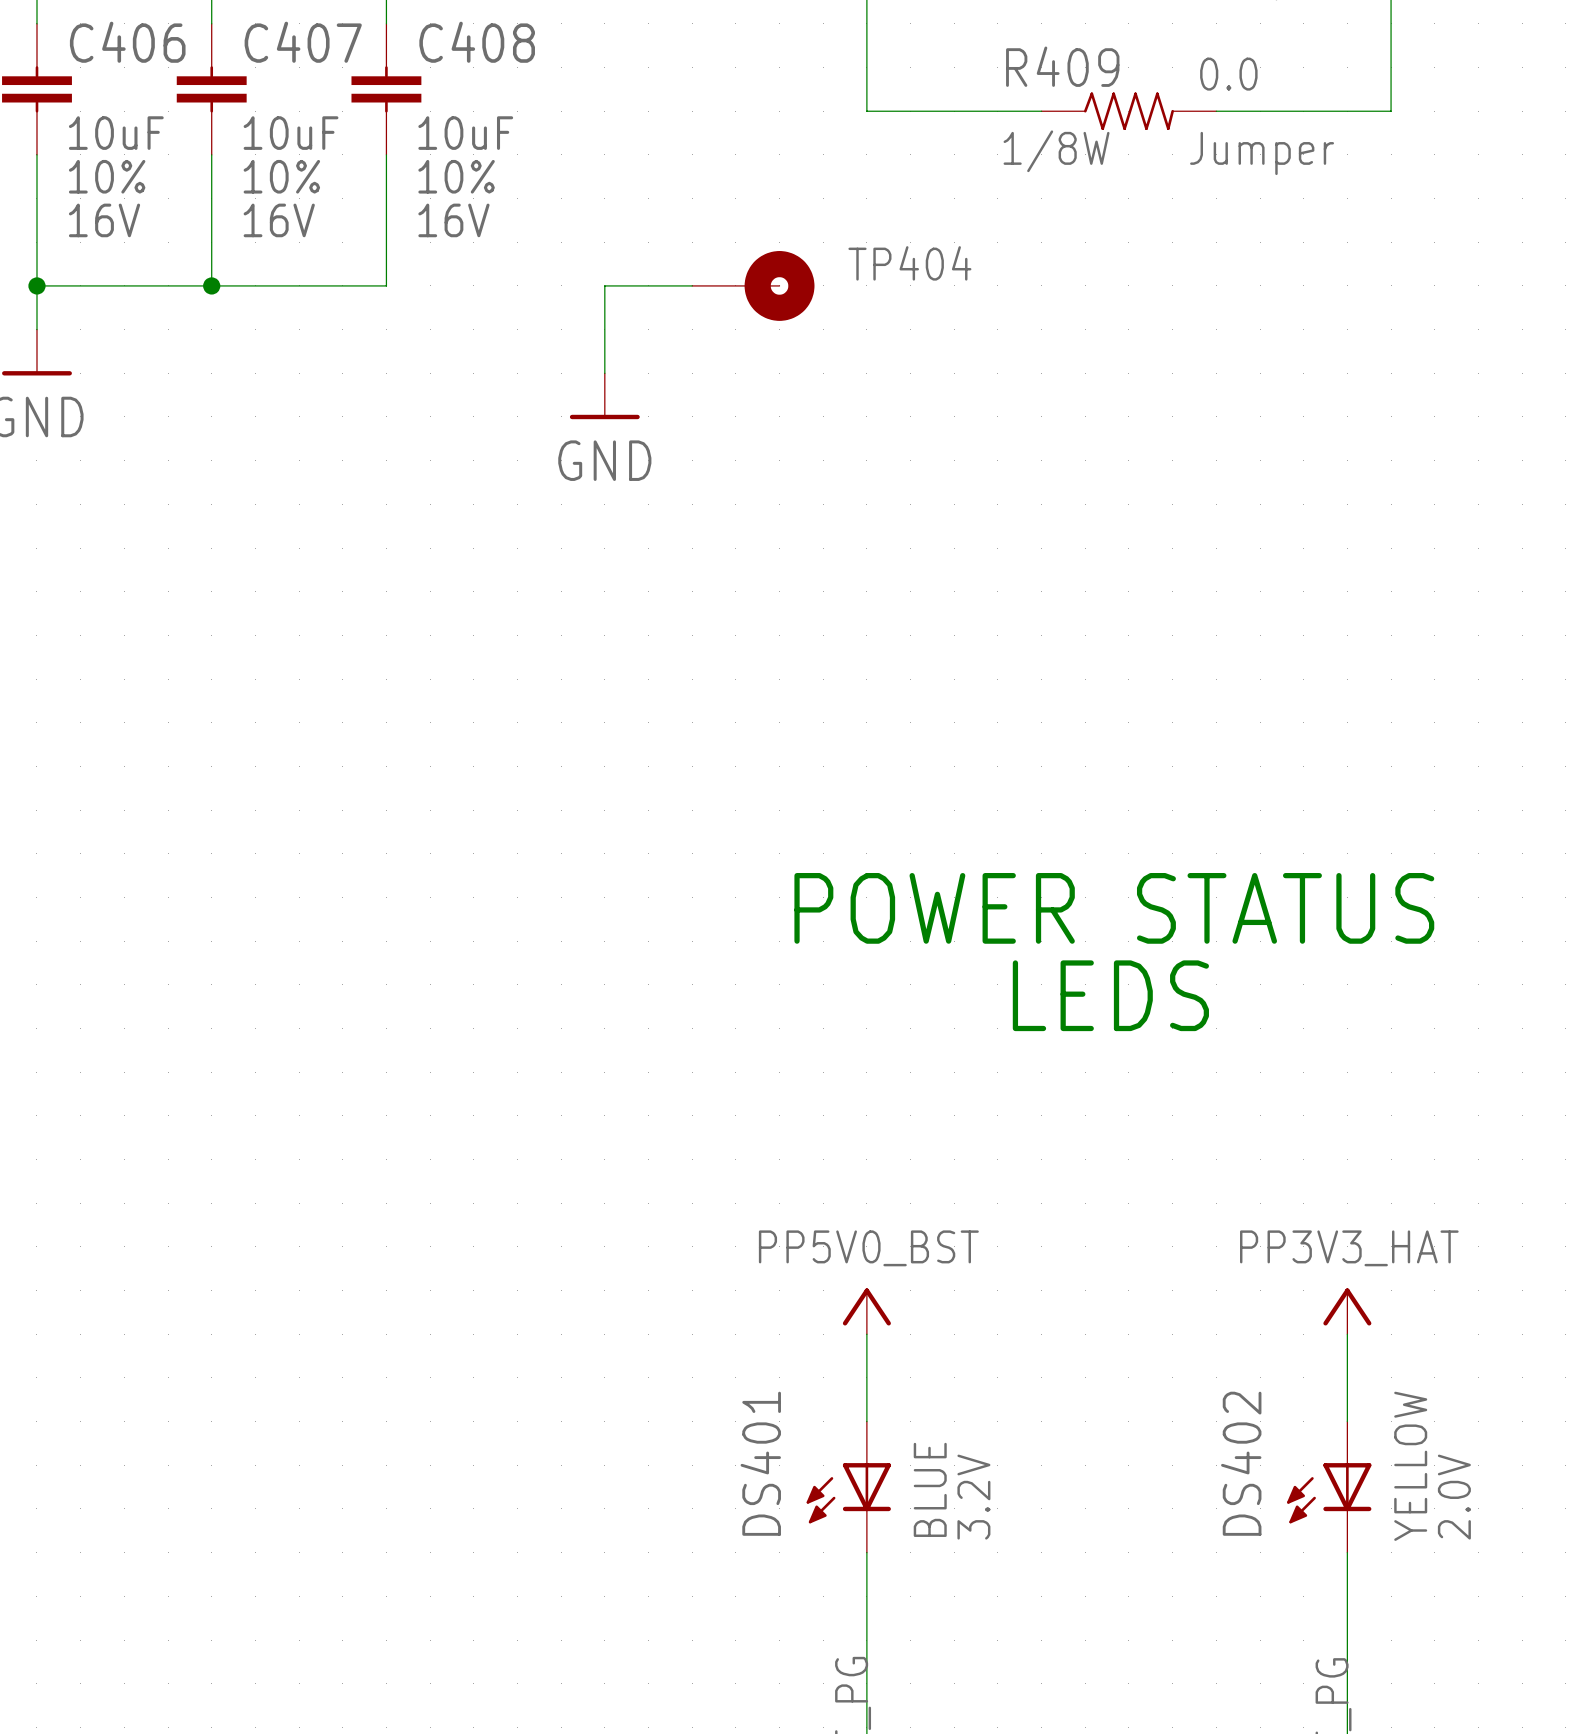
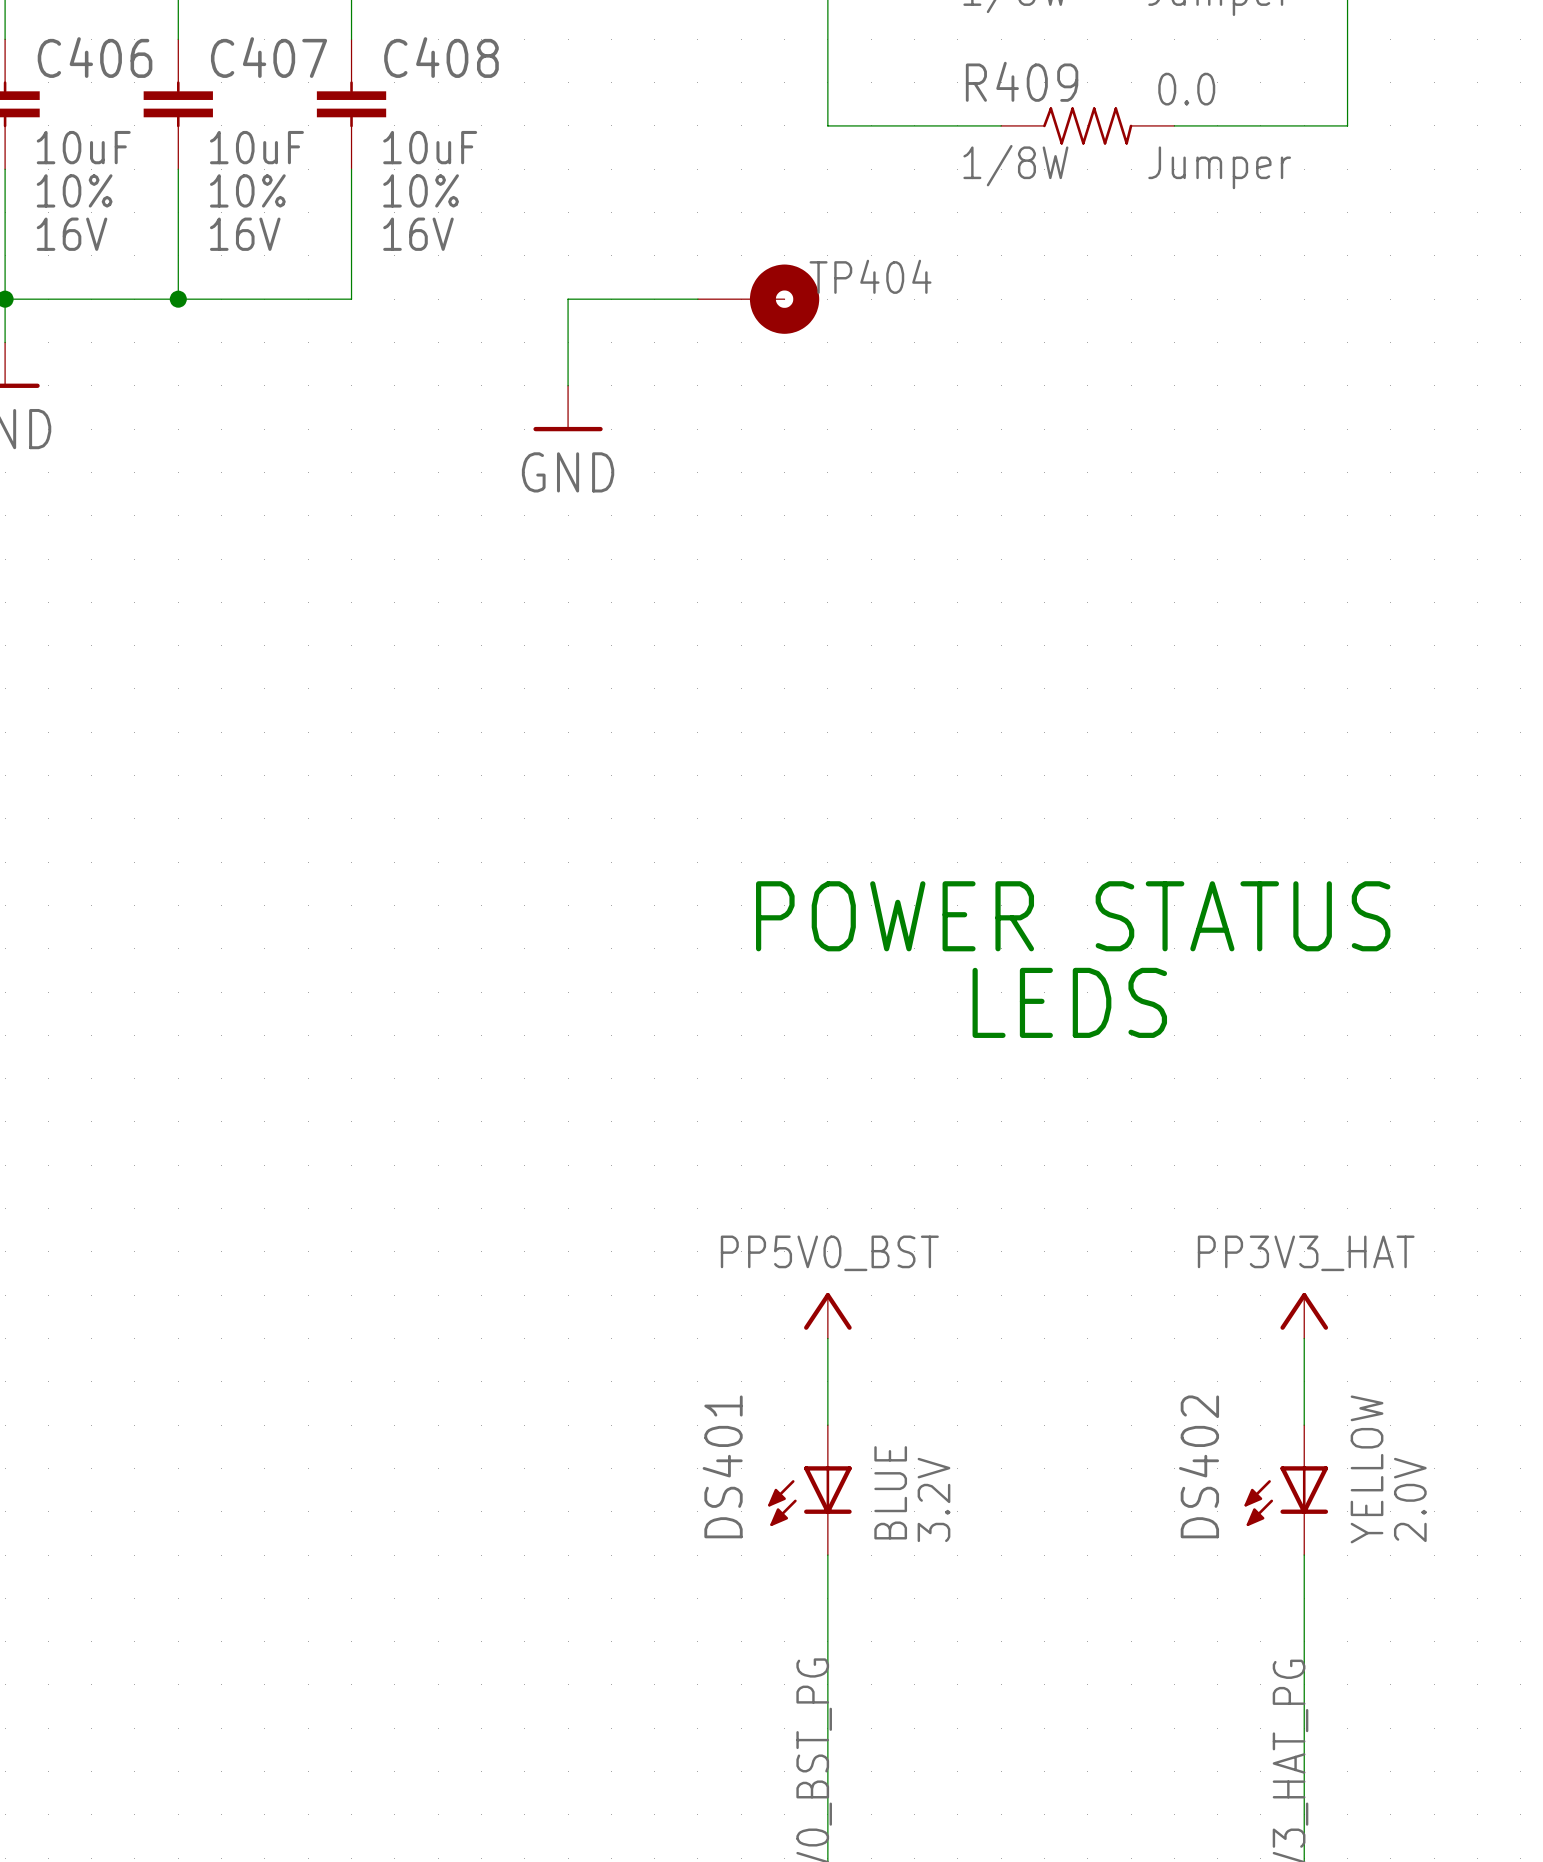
TP404 position: (753, 285) -> (758, 299)

